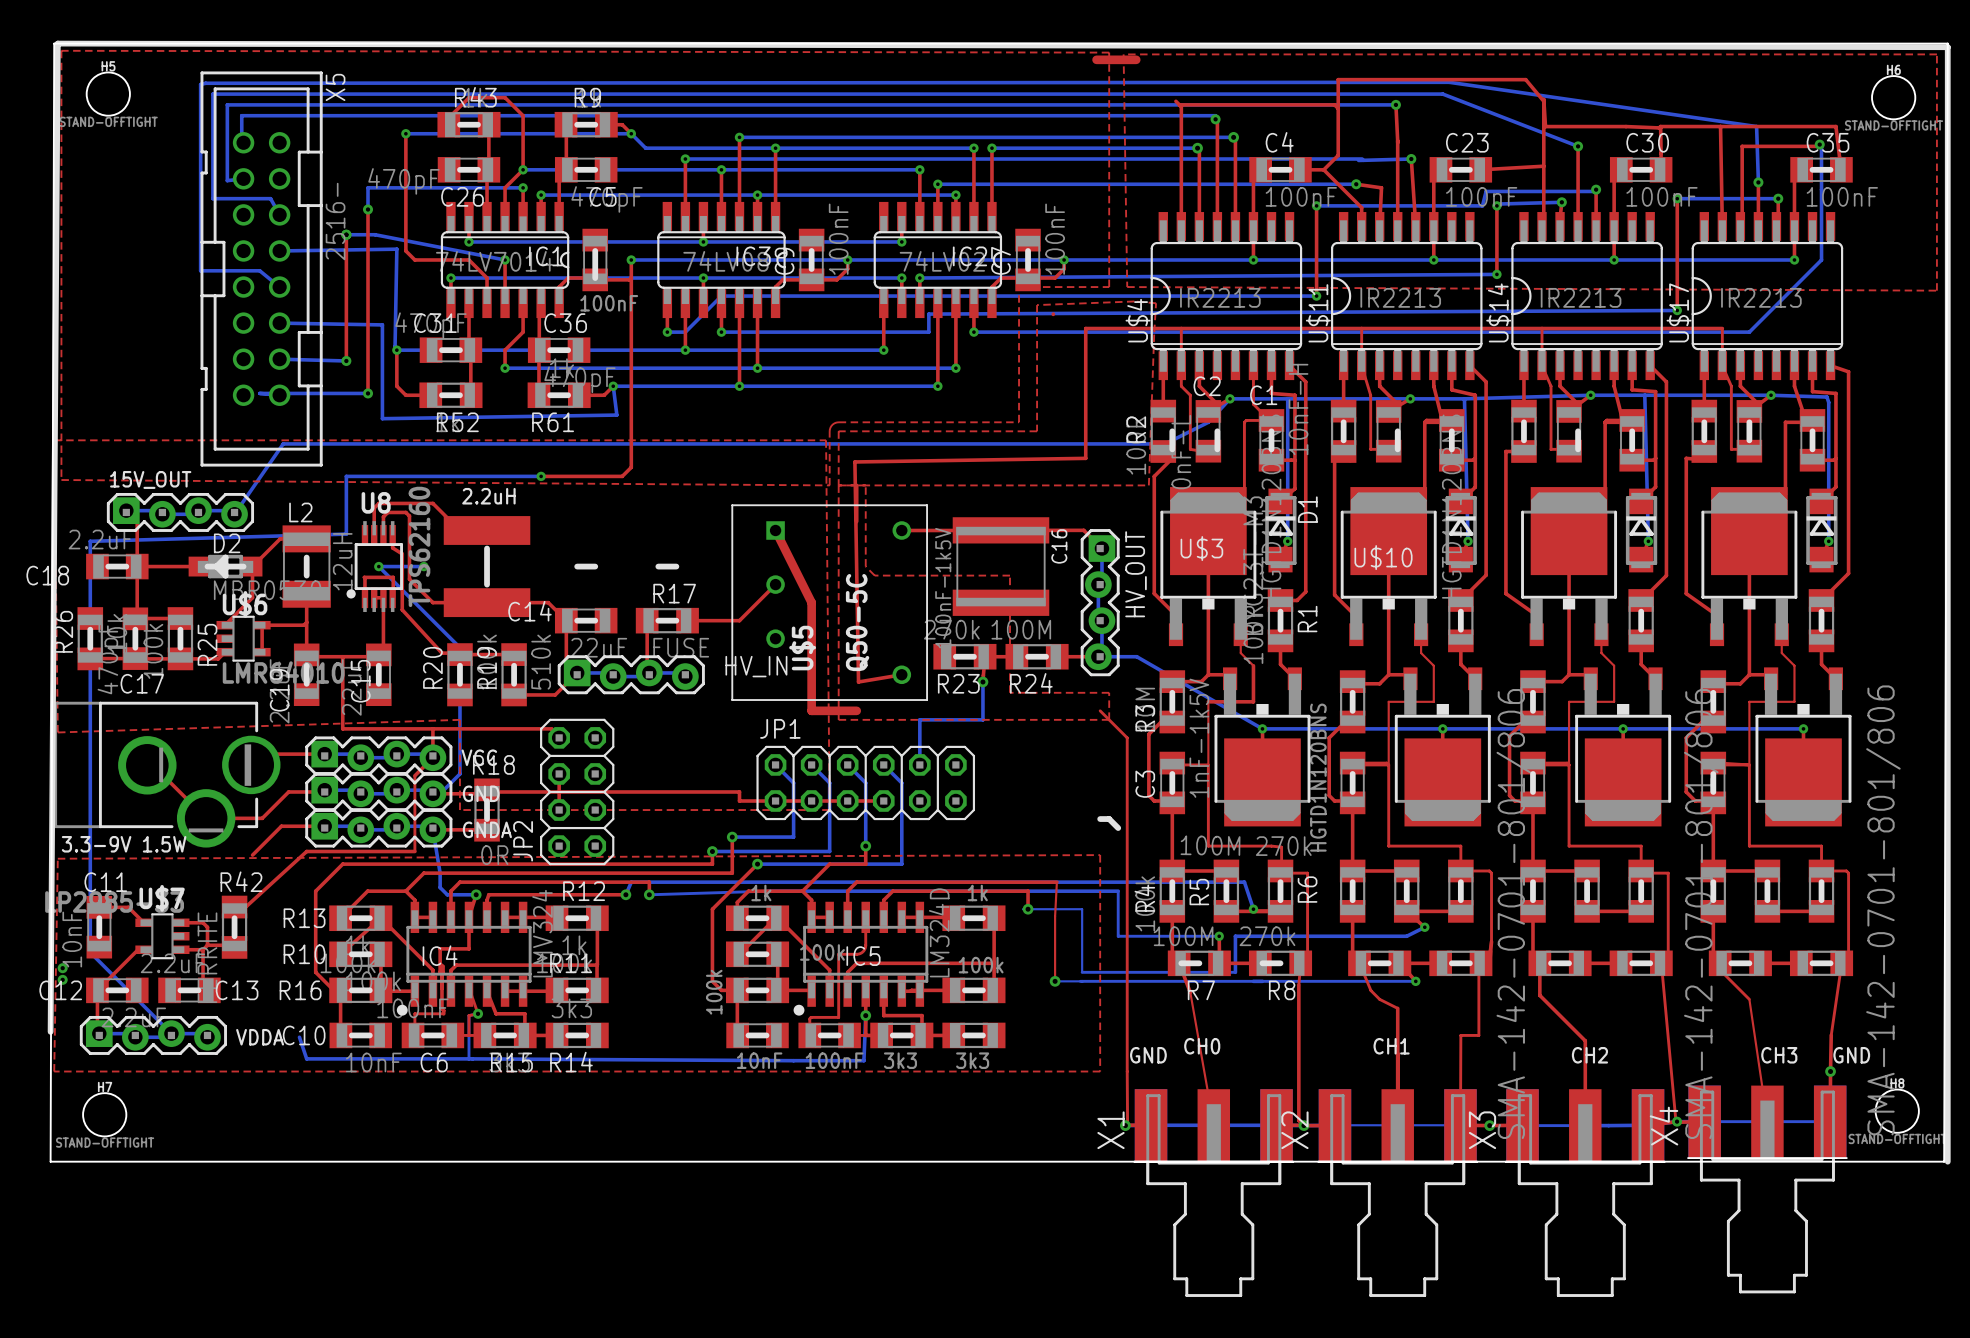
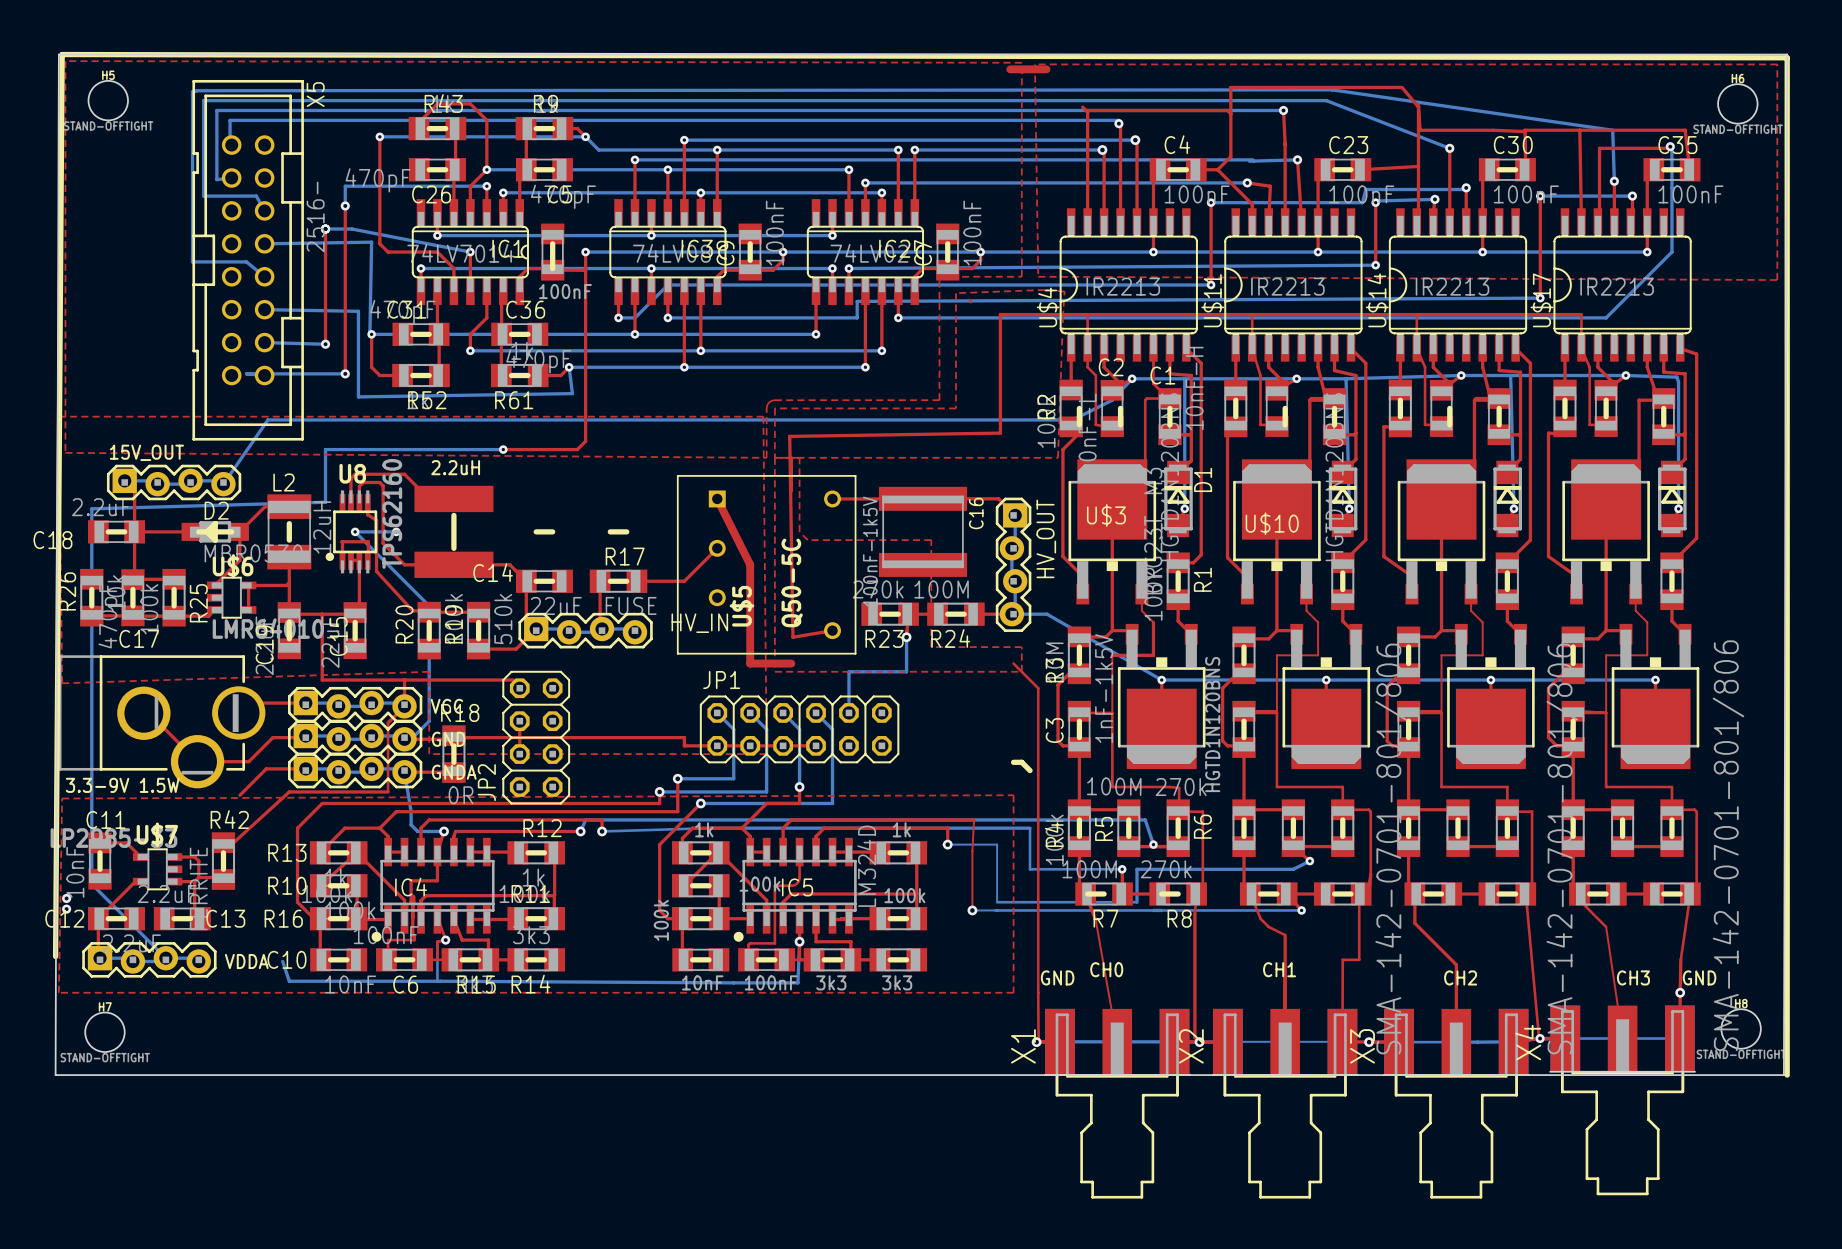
IC4 value: LMV324 (542, 933) -> none

